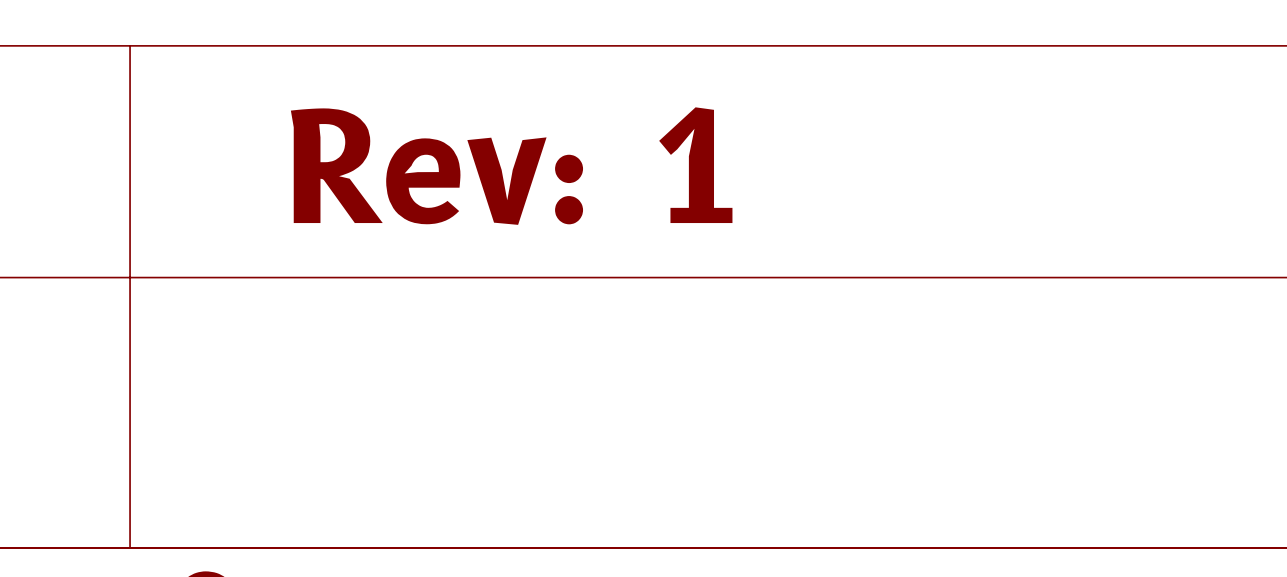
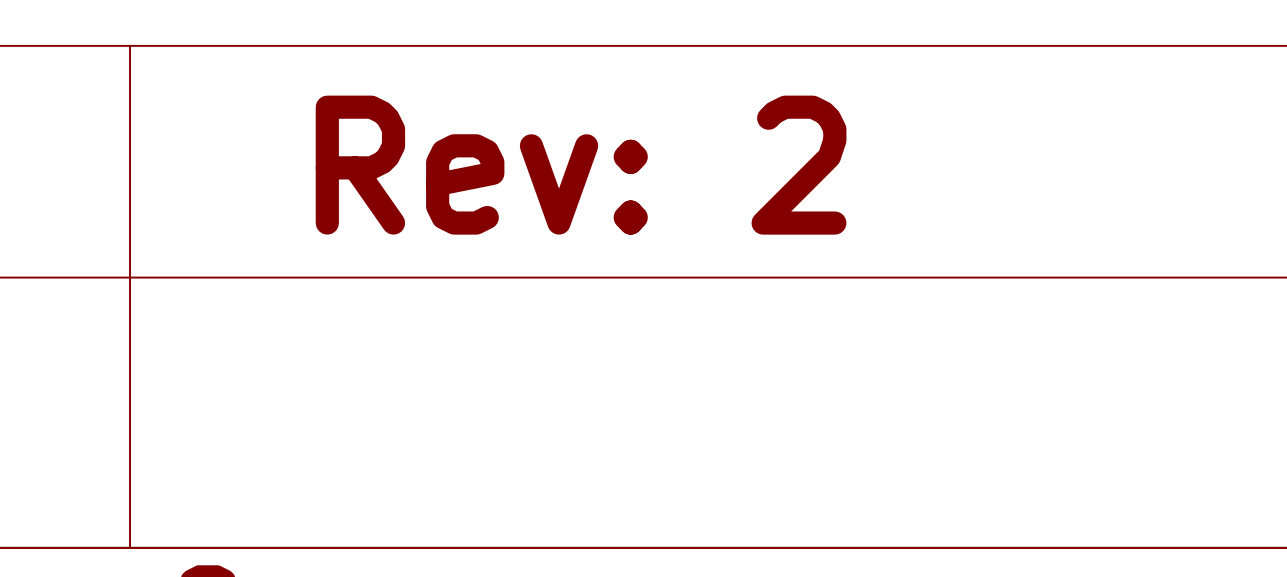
title block: Rev: 1 (511, 166) -> Rev: 2 (581, 165)

